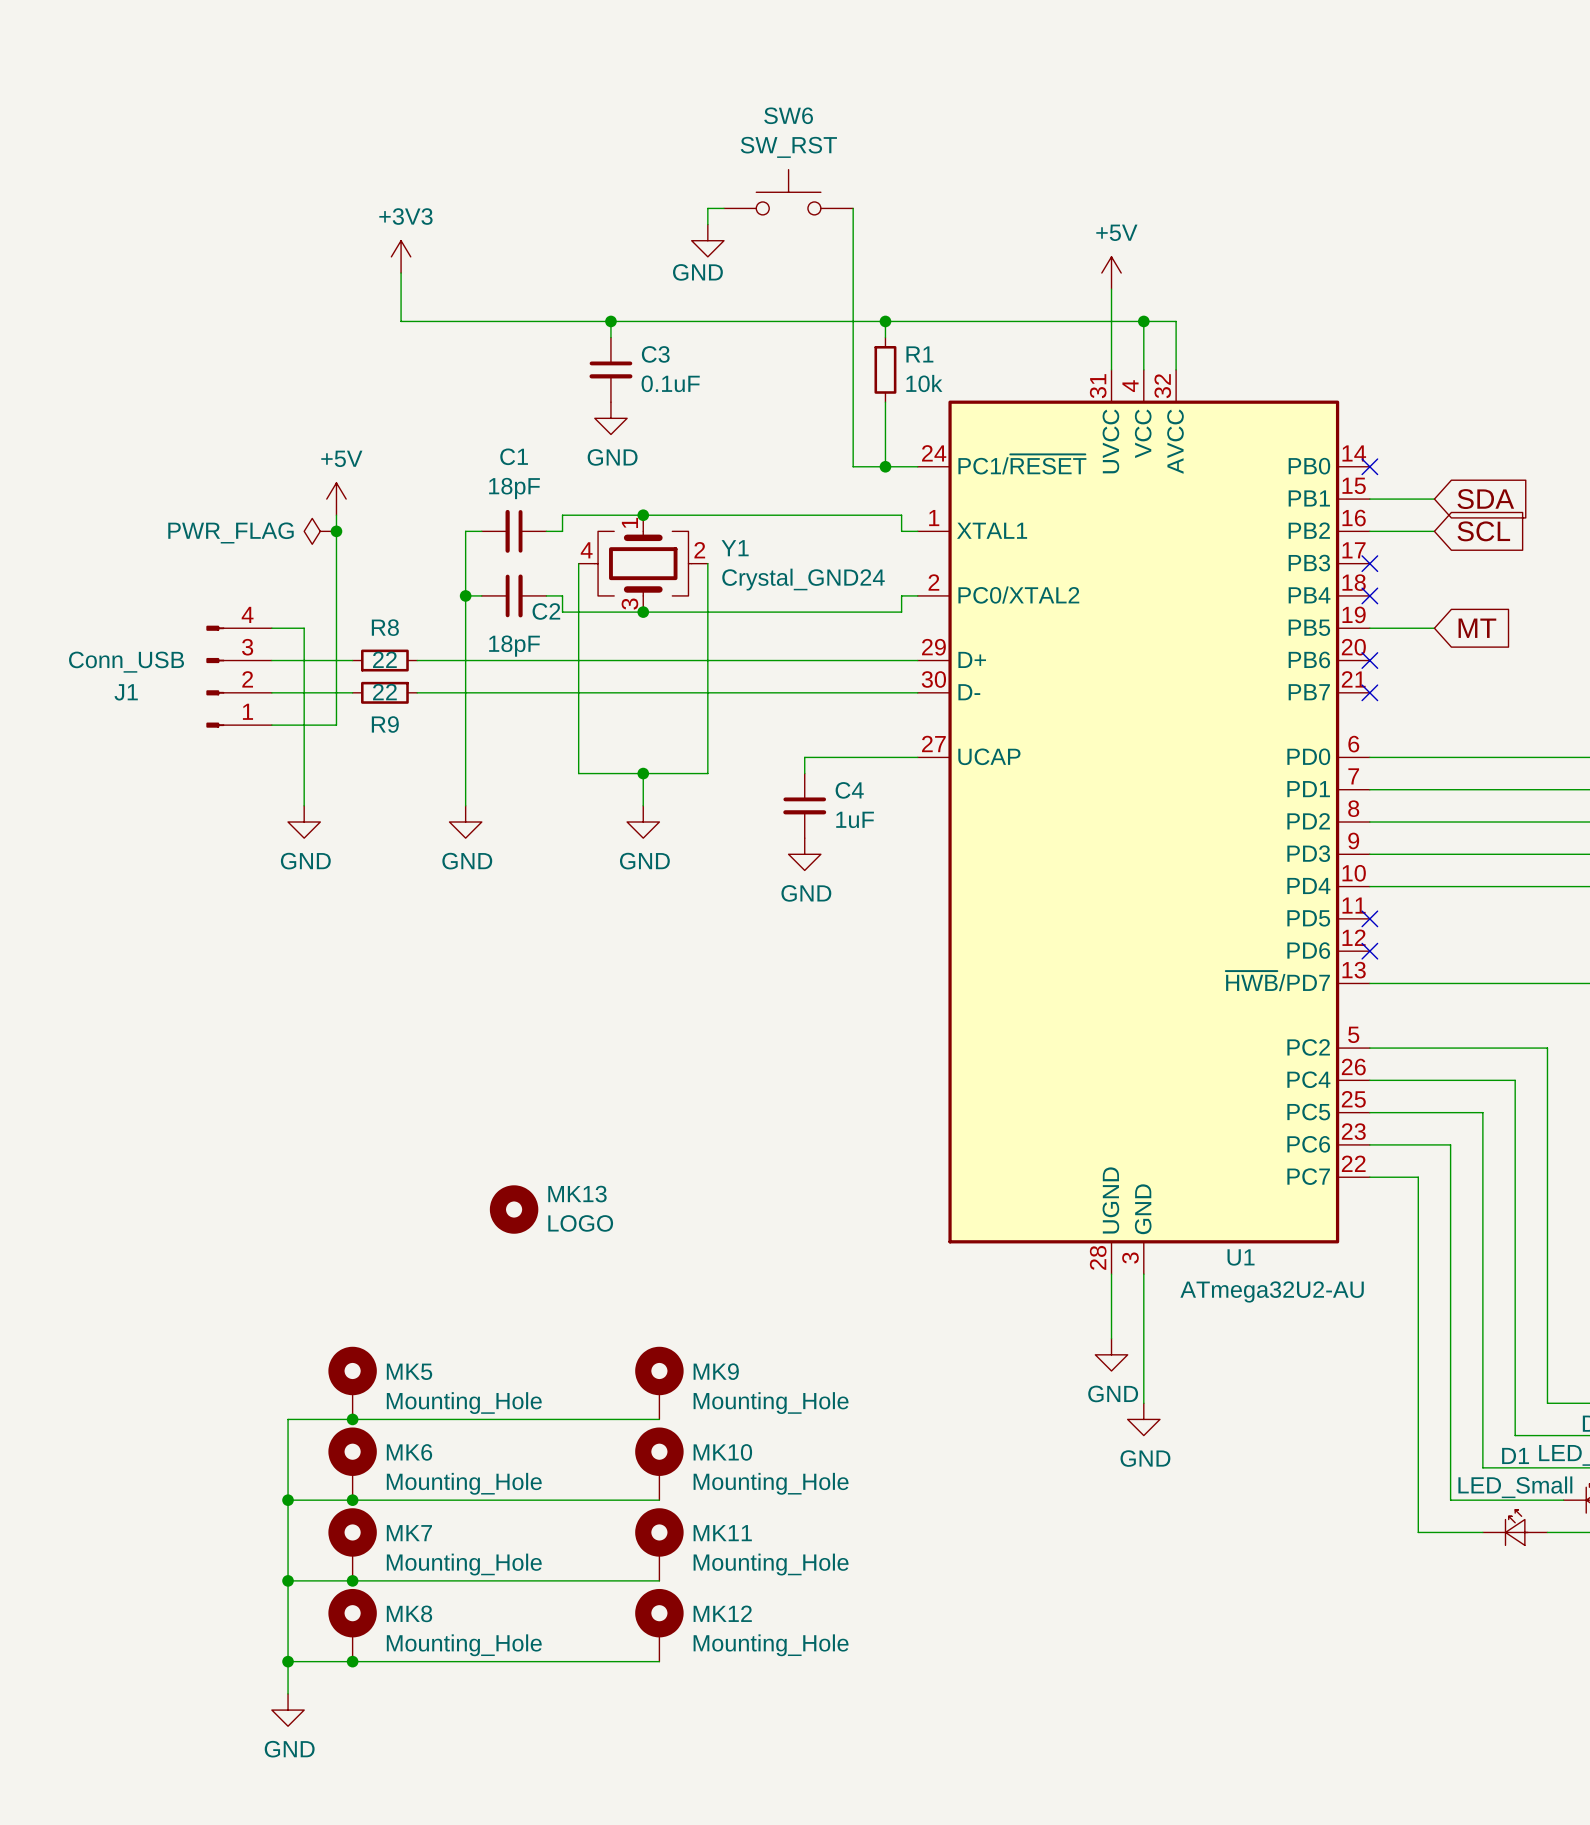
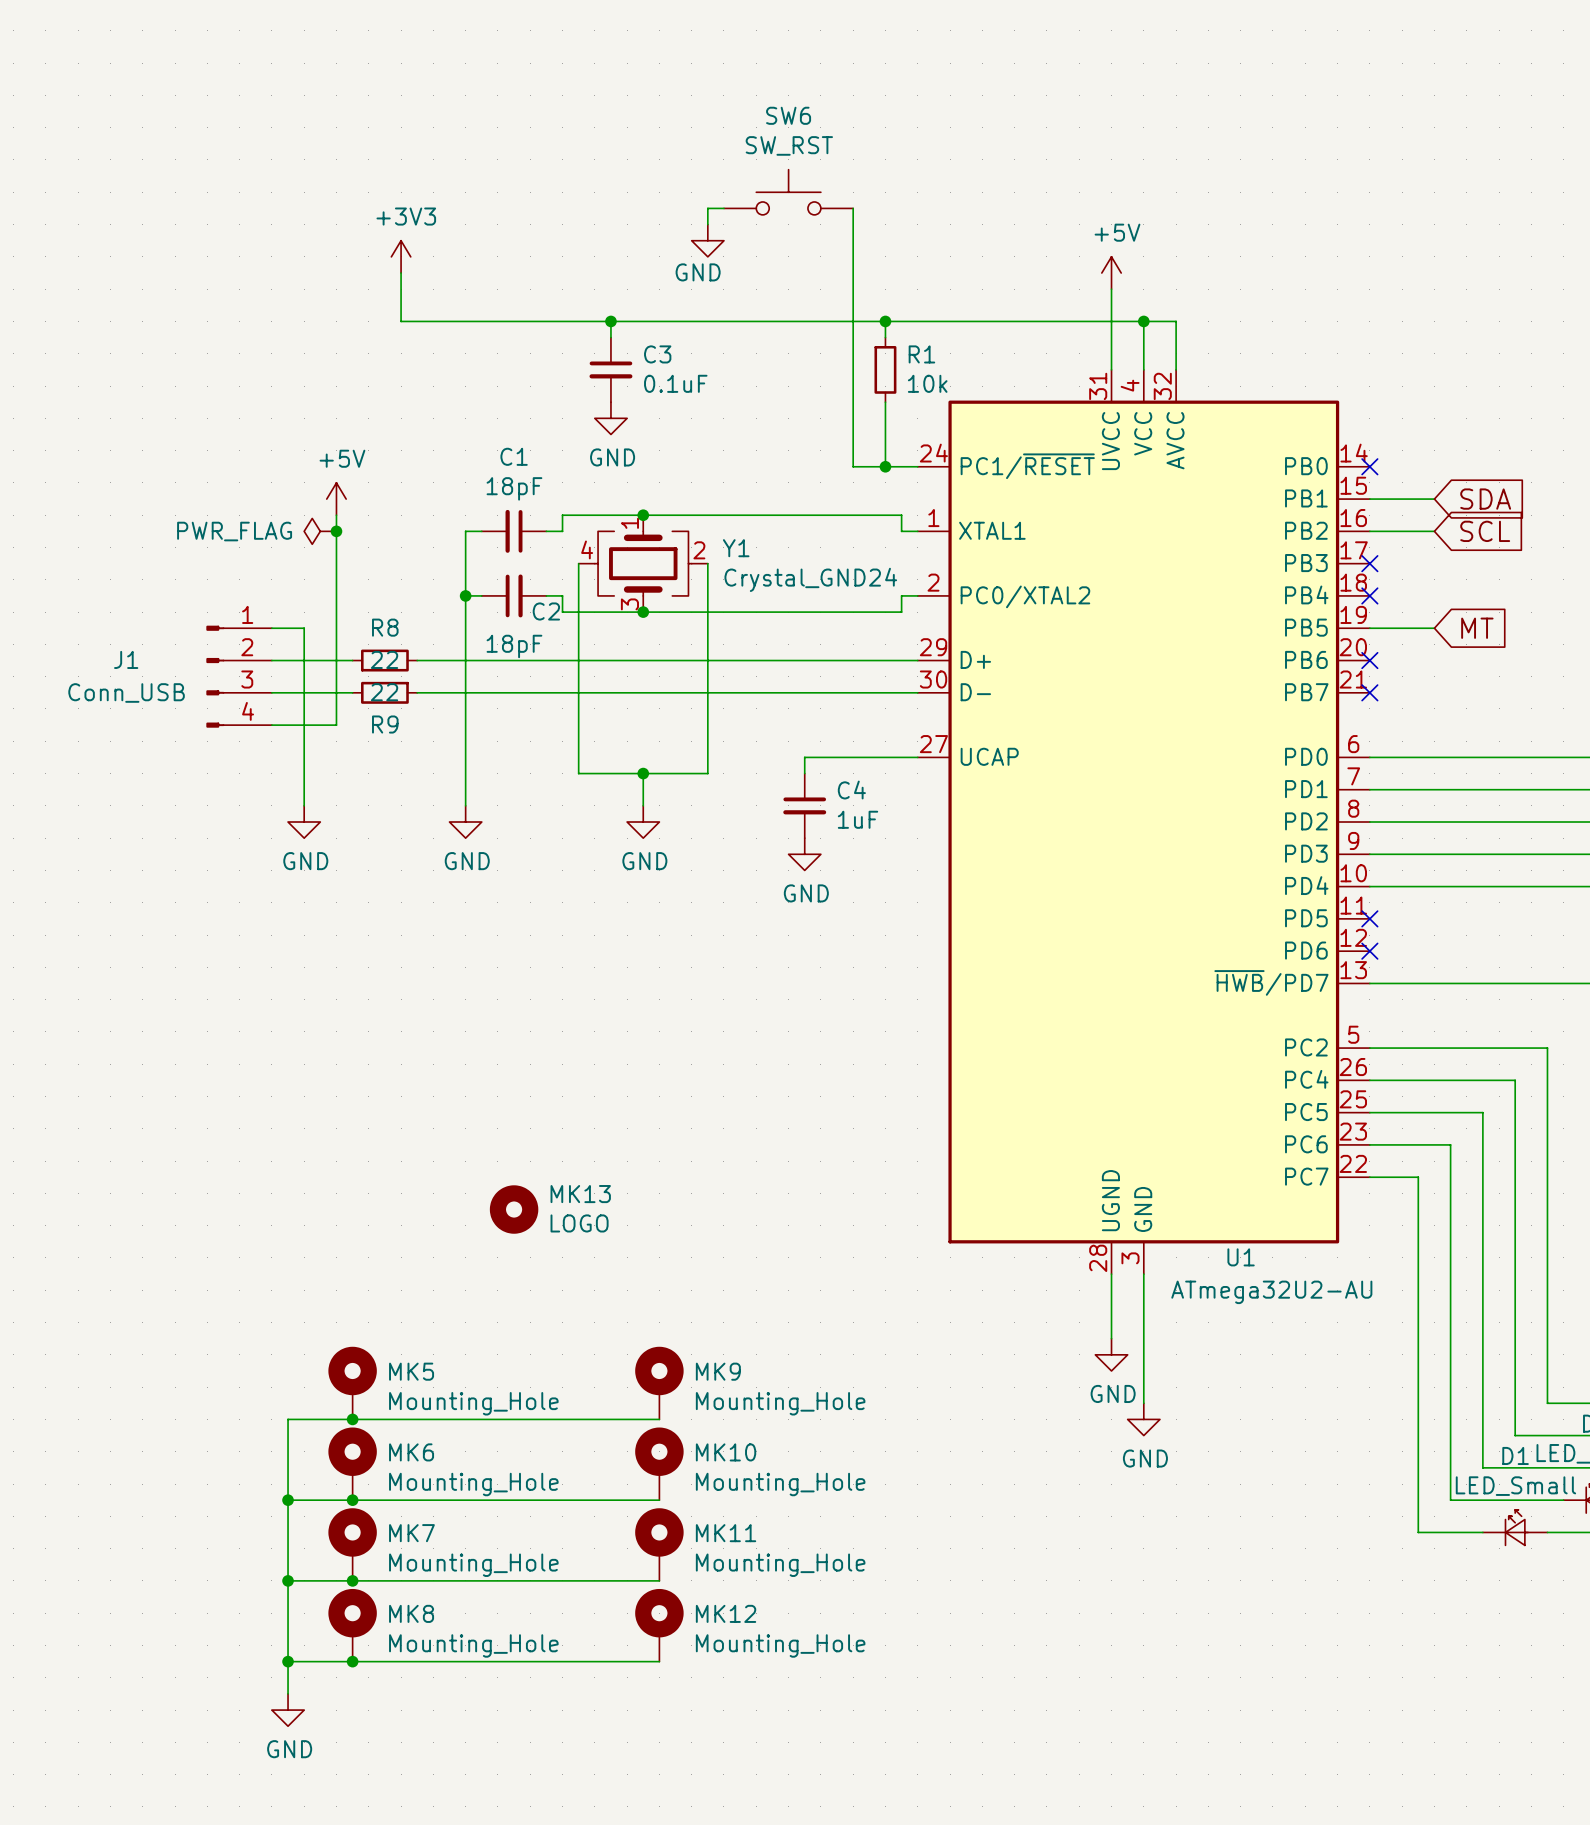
J1 flip: as is (215, 676) -> up-down (215, 676)

